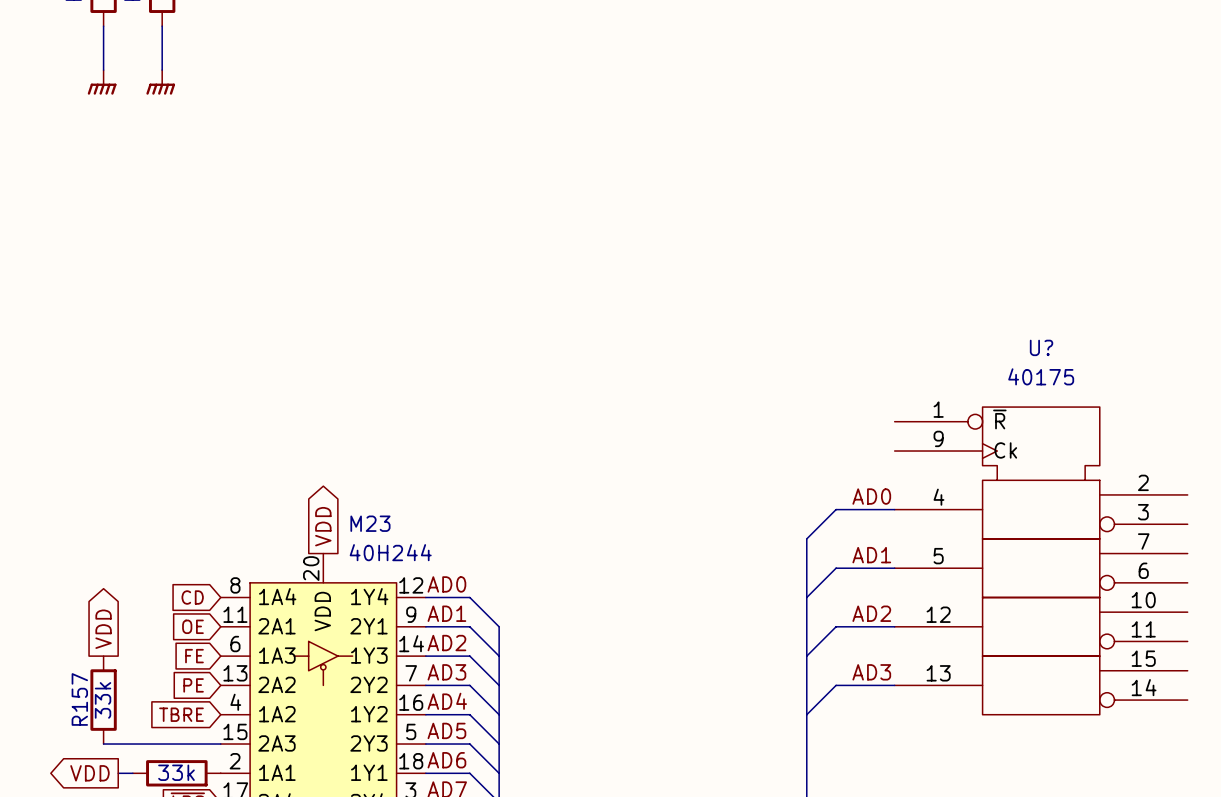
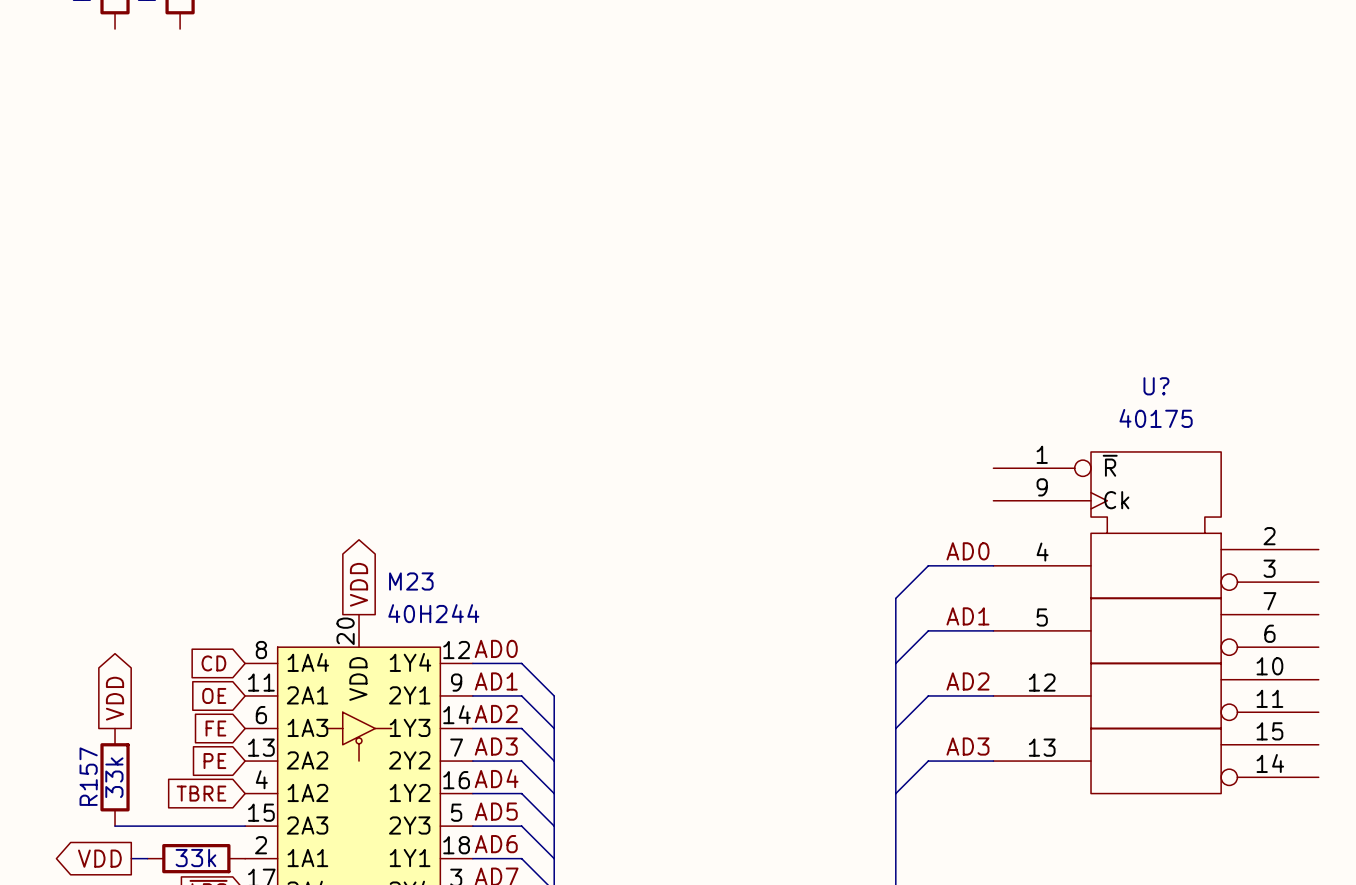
wire: (103, 26) (103, 70) -> none
wire: (162, 26) (162, 70) -> none
power symbol: (102, 82) -> none
power symbol: (160, 82) -> none

